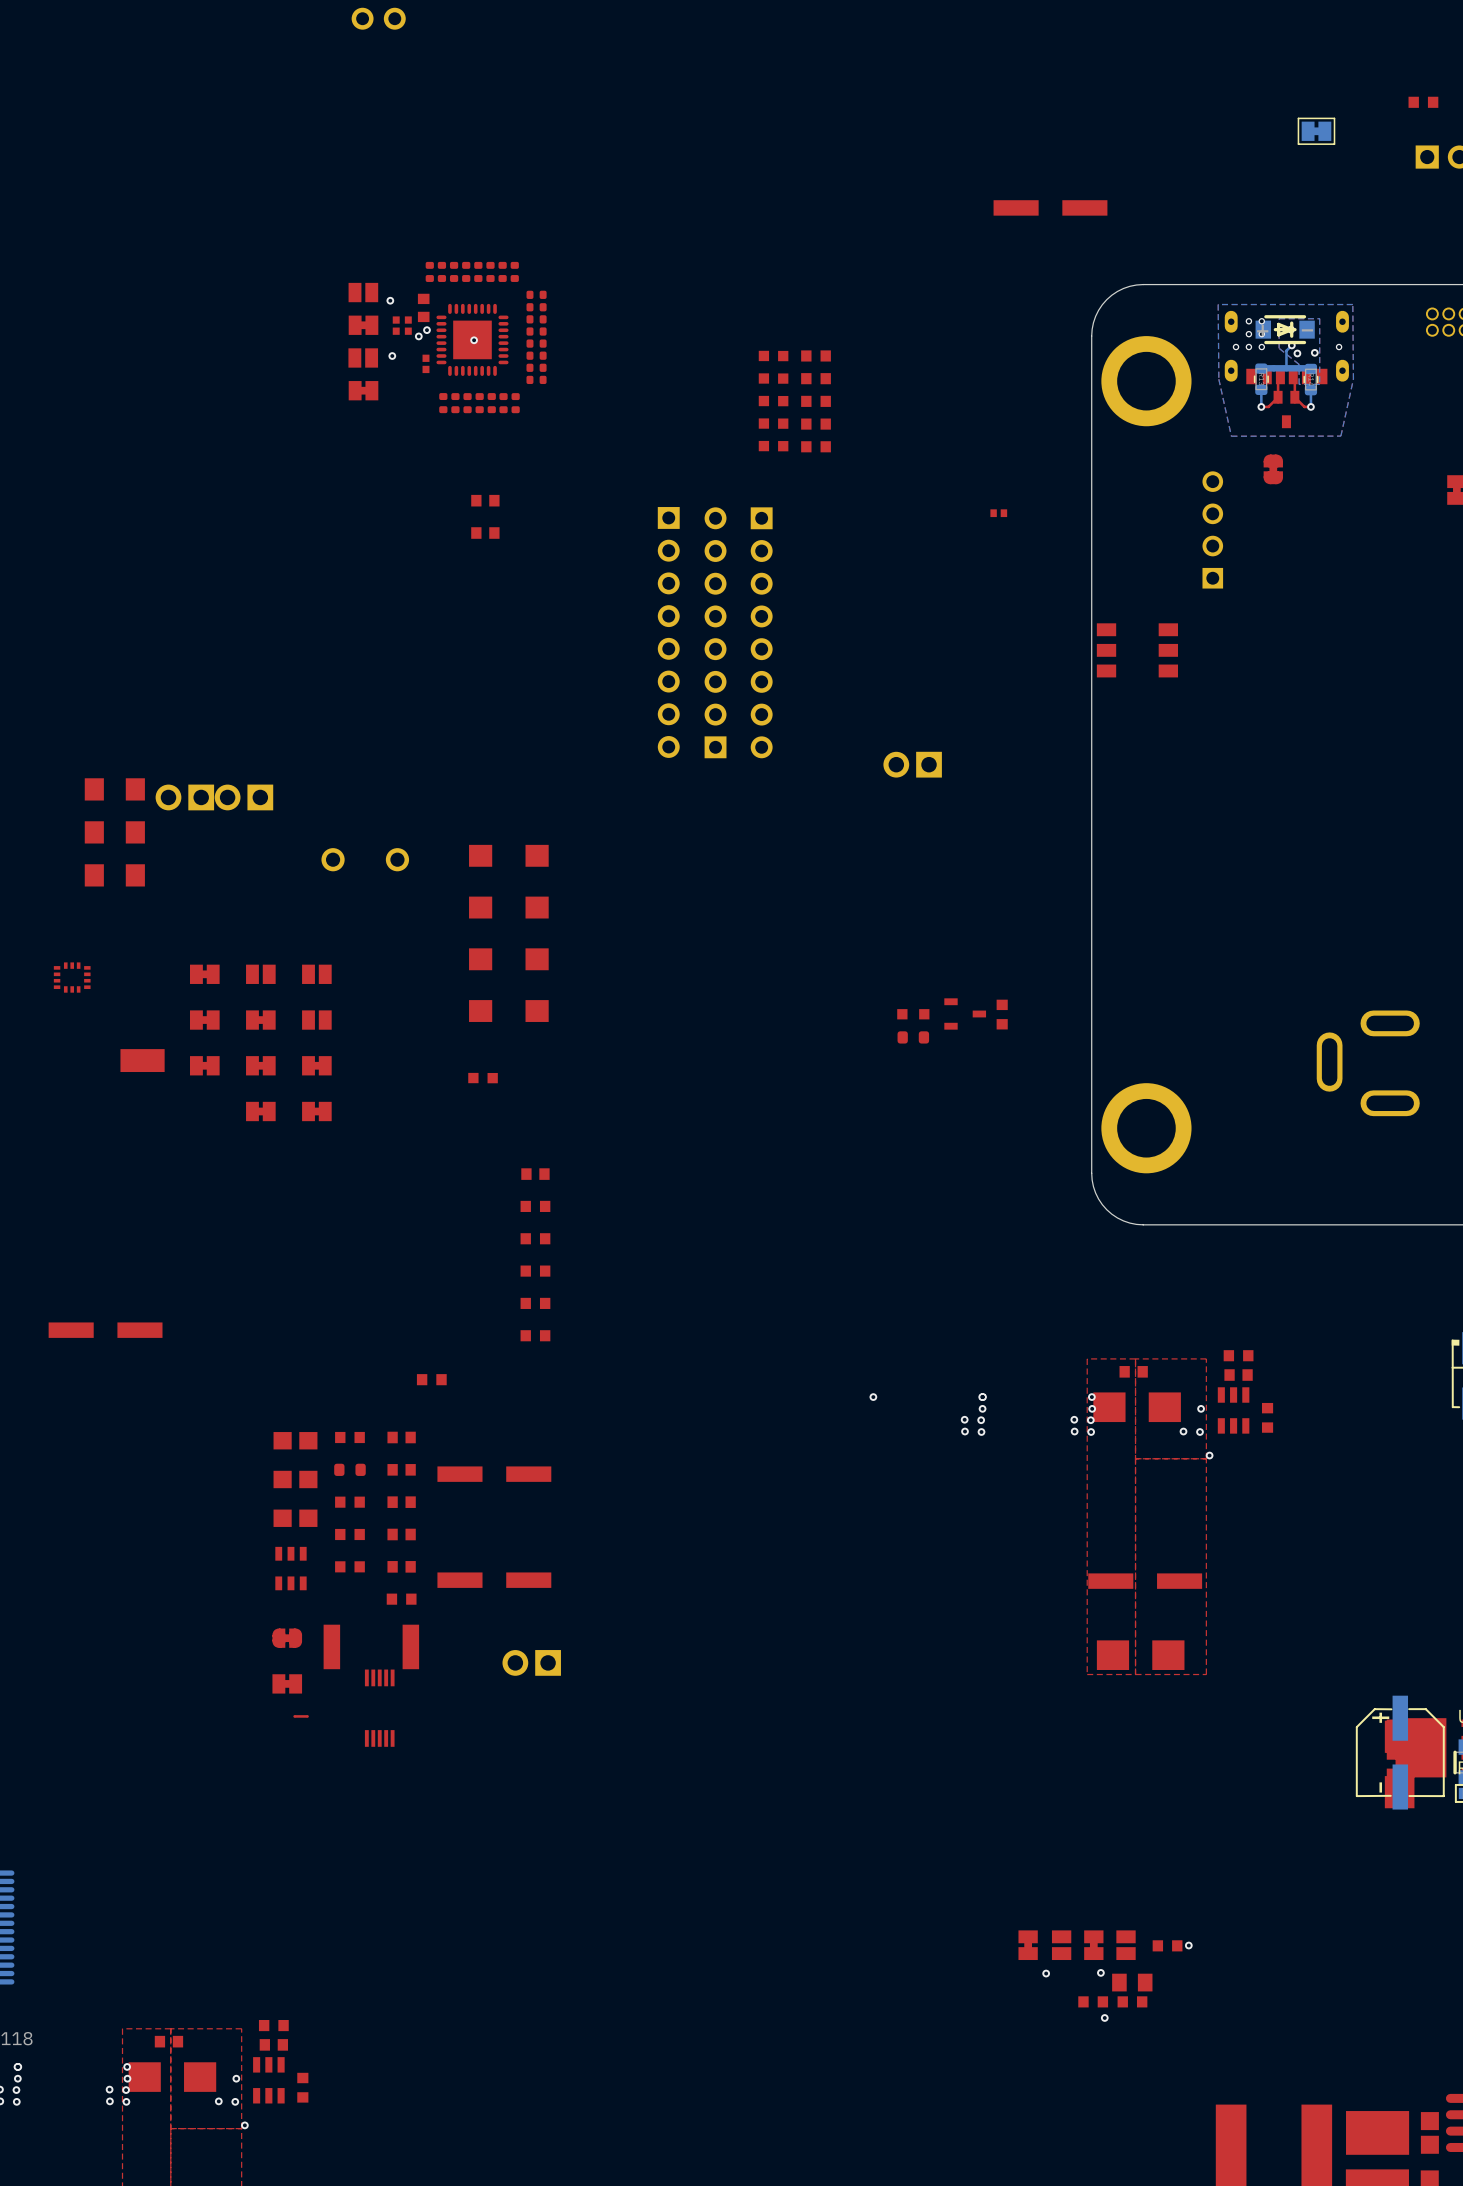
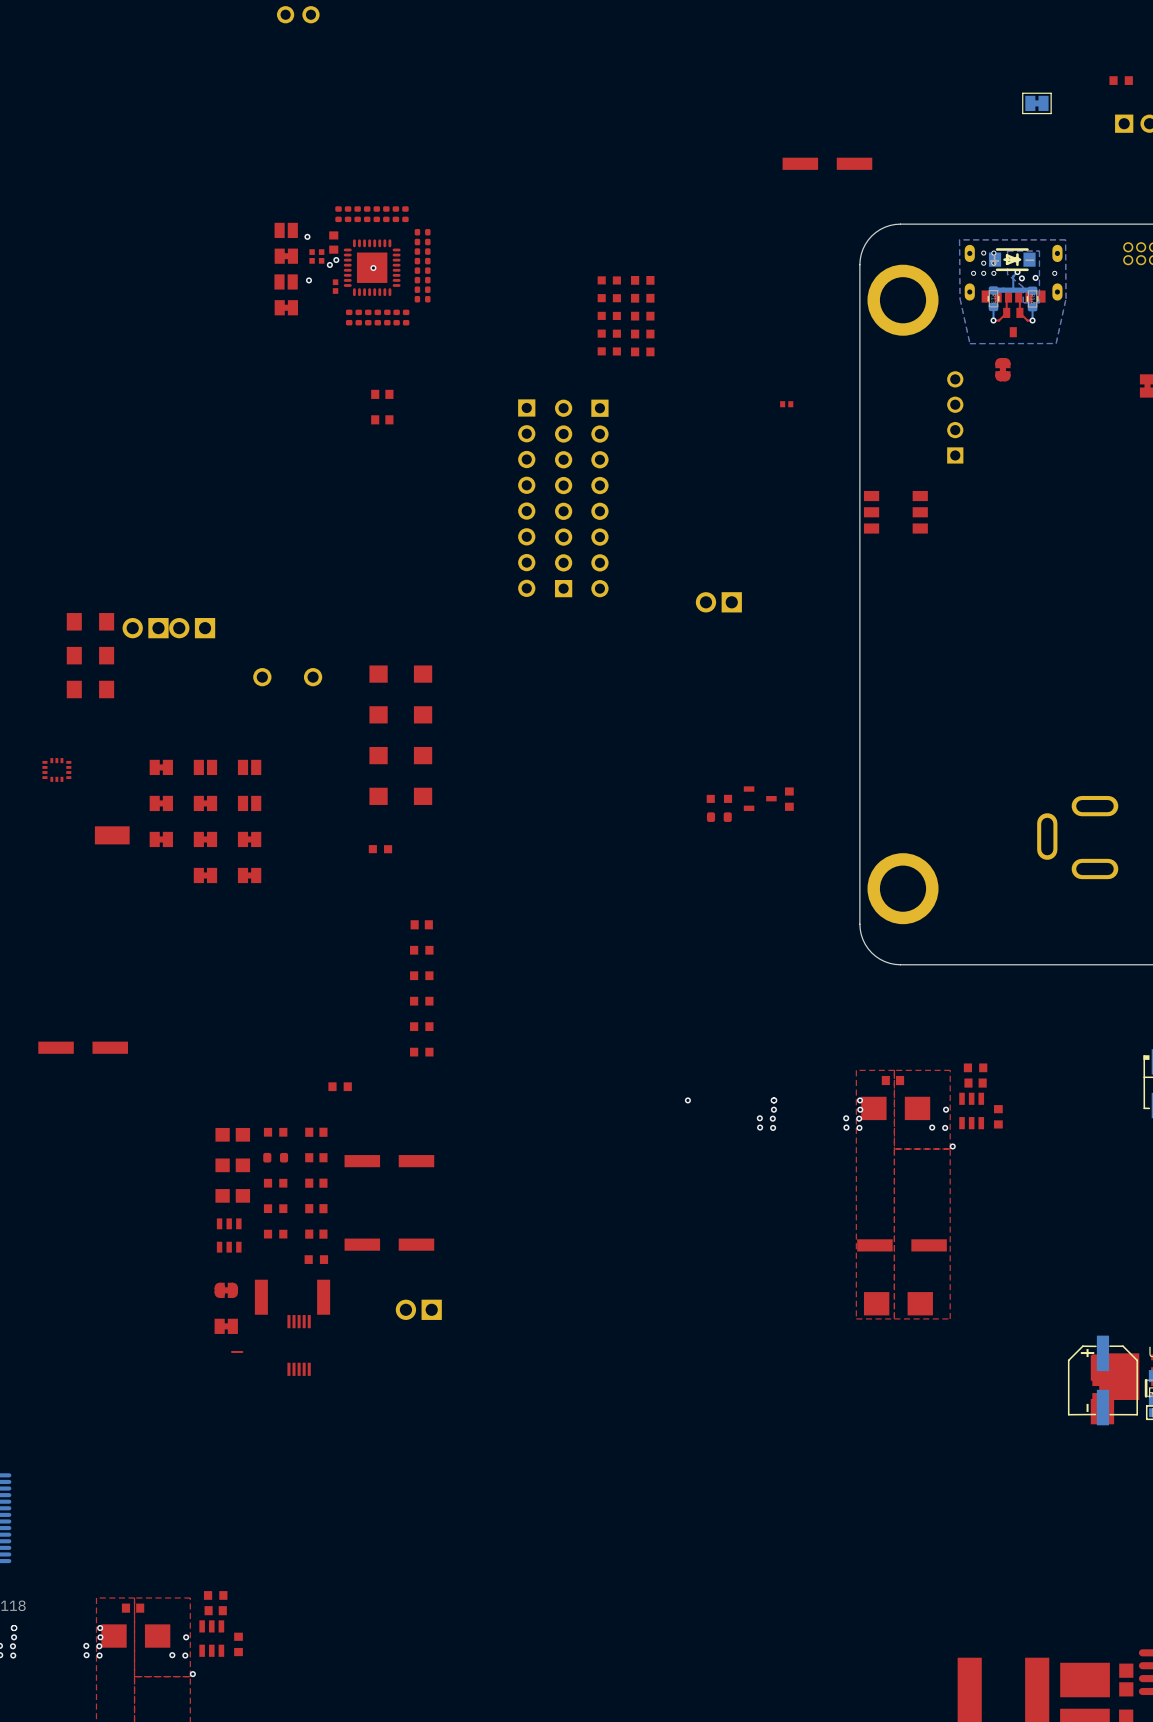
part: (1028, 1945) -> none
part: (1061, 1945) -> none
part: (1093, 1945) -> none
part: (1126, 1945) -> none
part: (1167, 1945) -> none
via: (1188, 1945) -> none
via: (1100, 1972) -> none
via: (1046, 1973) -> none
part: (1132, 1982) -> none
part: (1093, 2001) -> none
part: (1132, 2001) -> none
via: (1104, 2017) -> none

